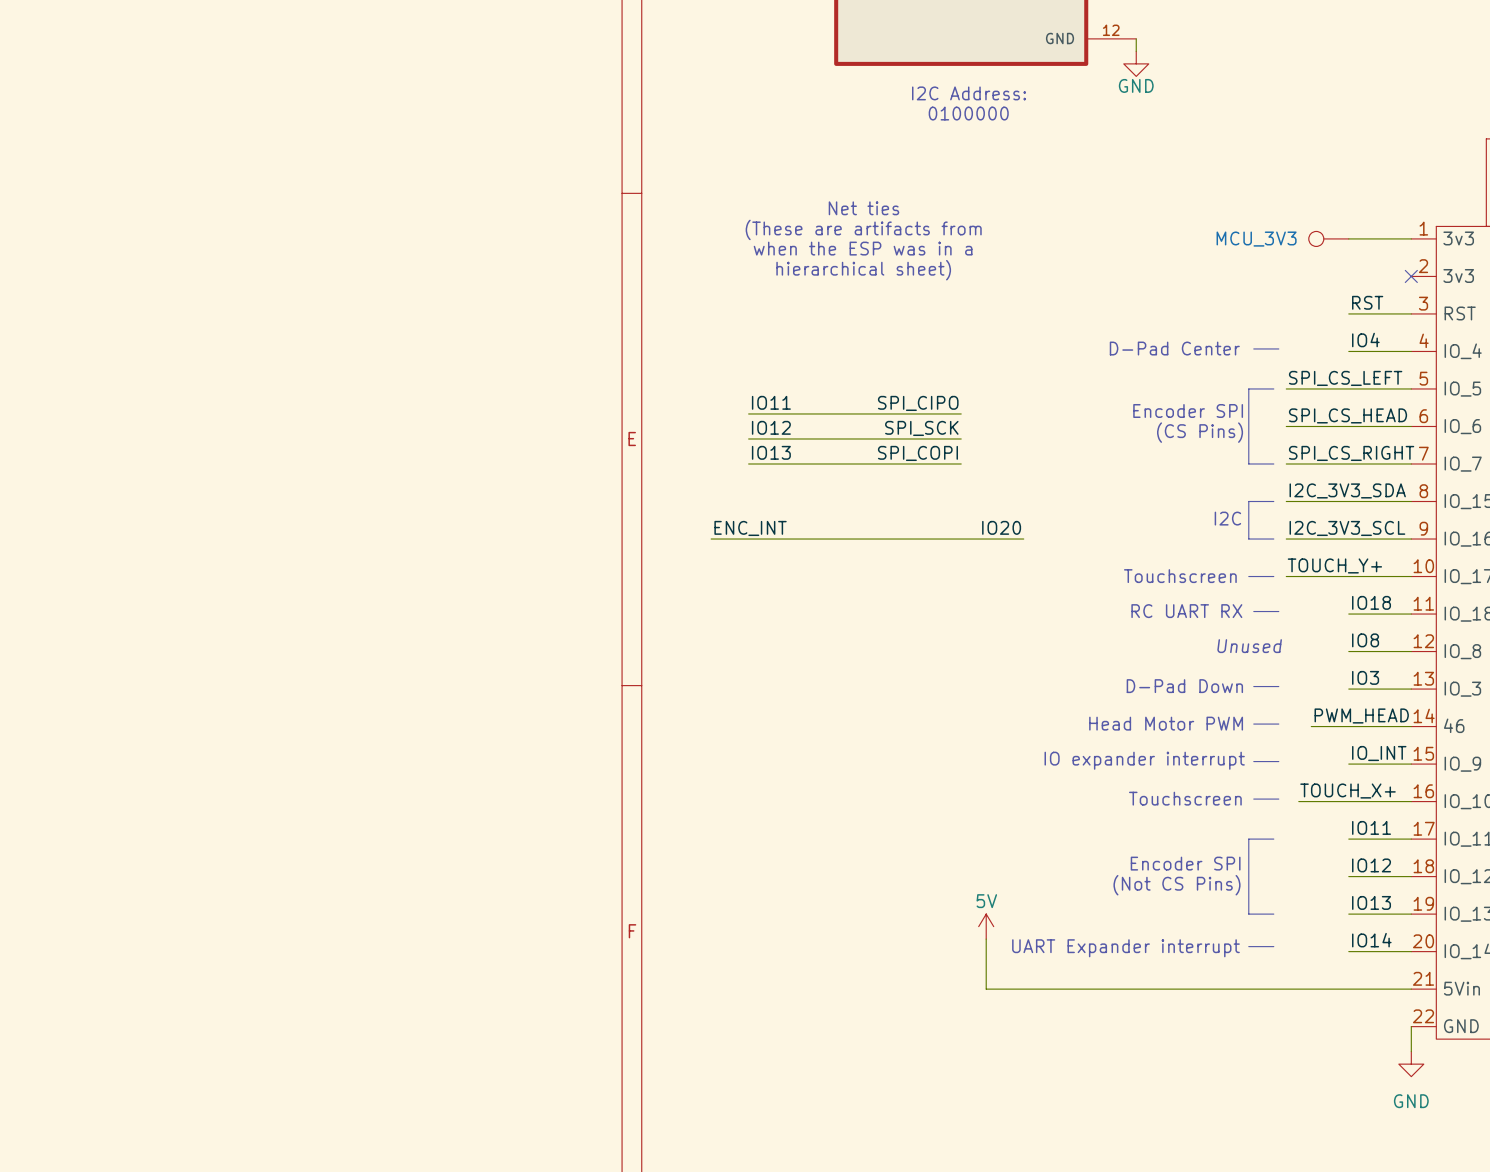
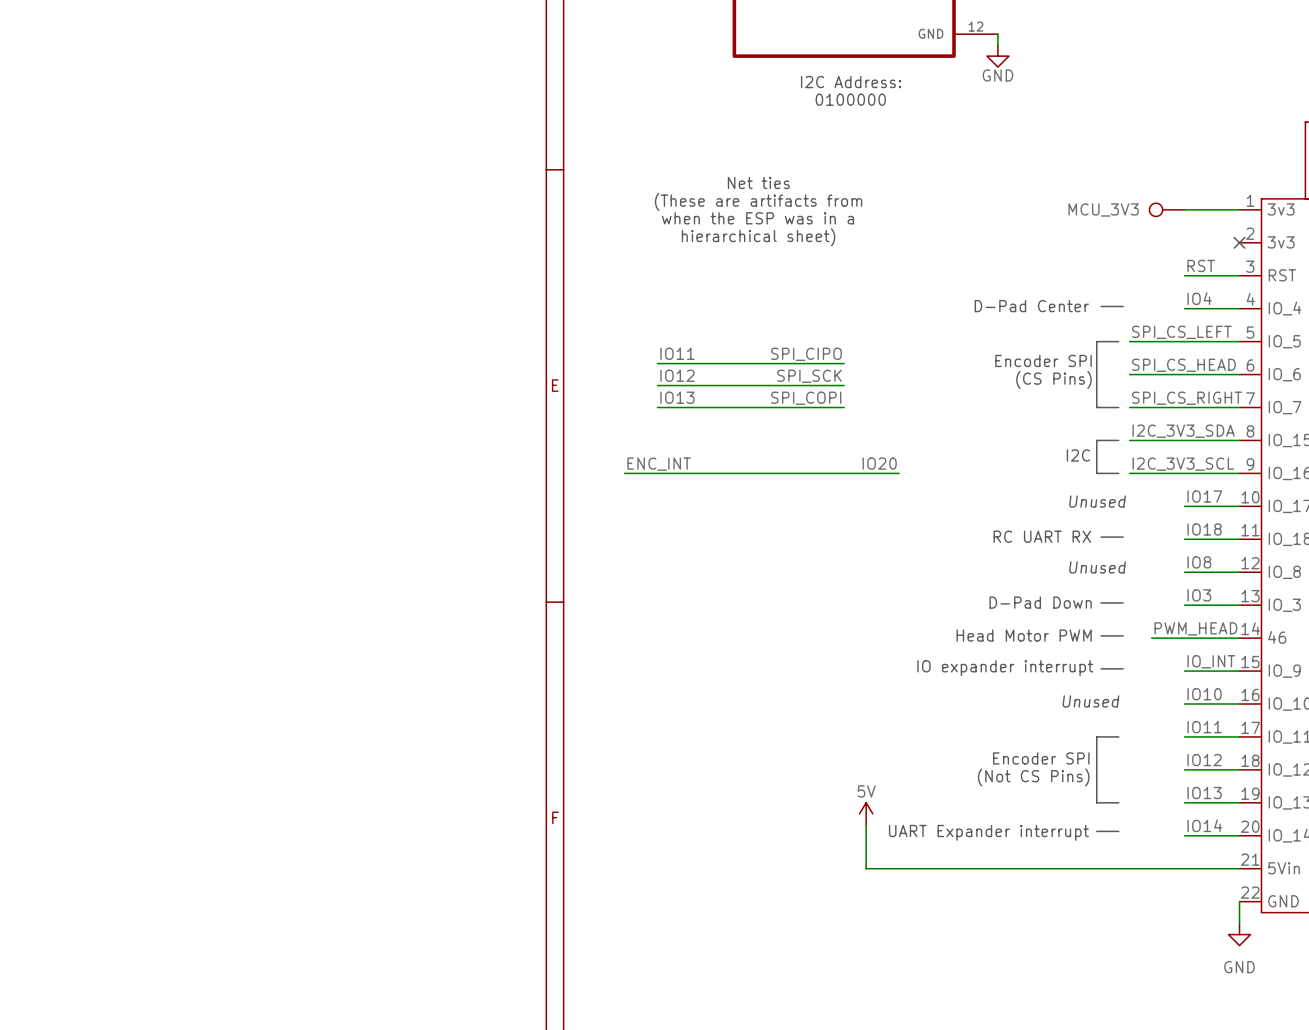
label: TOUCH_Y+ (1334, 565) -> none
label: none -> IO17 (1204, 496)
text: none -> Unused (1097, 501)
text: Touchscreen (1180, 576) -> none
line: (1248, 576) (1273, 576) -> none
wire: (1286, 576) (1348, 576) -> none
label: none -> IO10 (1204, 694)
label: TOUCH_X+ (1348, 791) -> none
text: Touchscreen (1185, 798) -> none
text: none -> Unused (1090, 701)
line: (1253, 799) (1278, 799) -> none
wire: (1298, 801) (1348, 801) -> none

